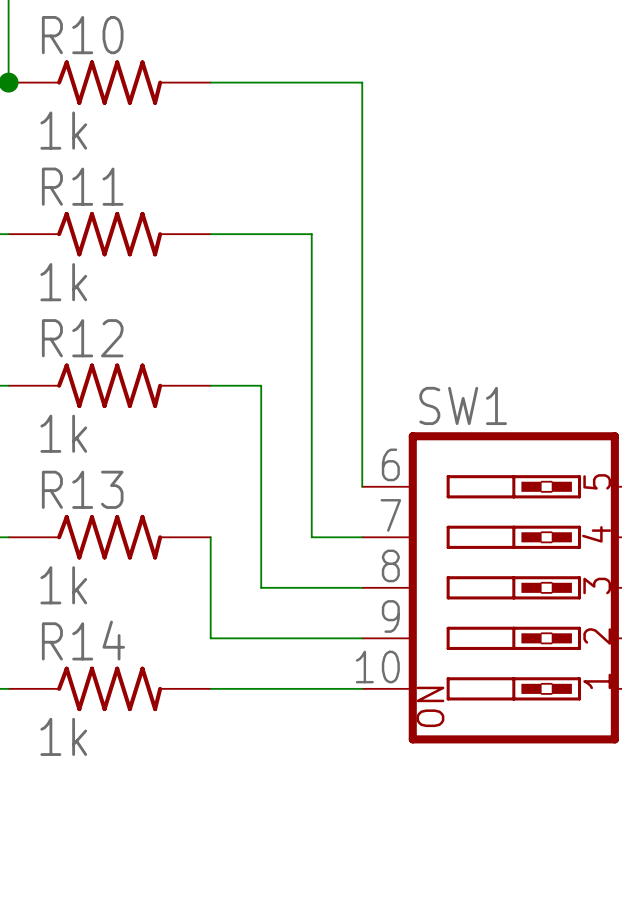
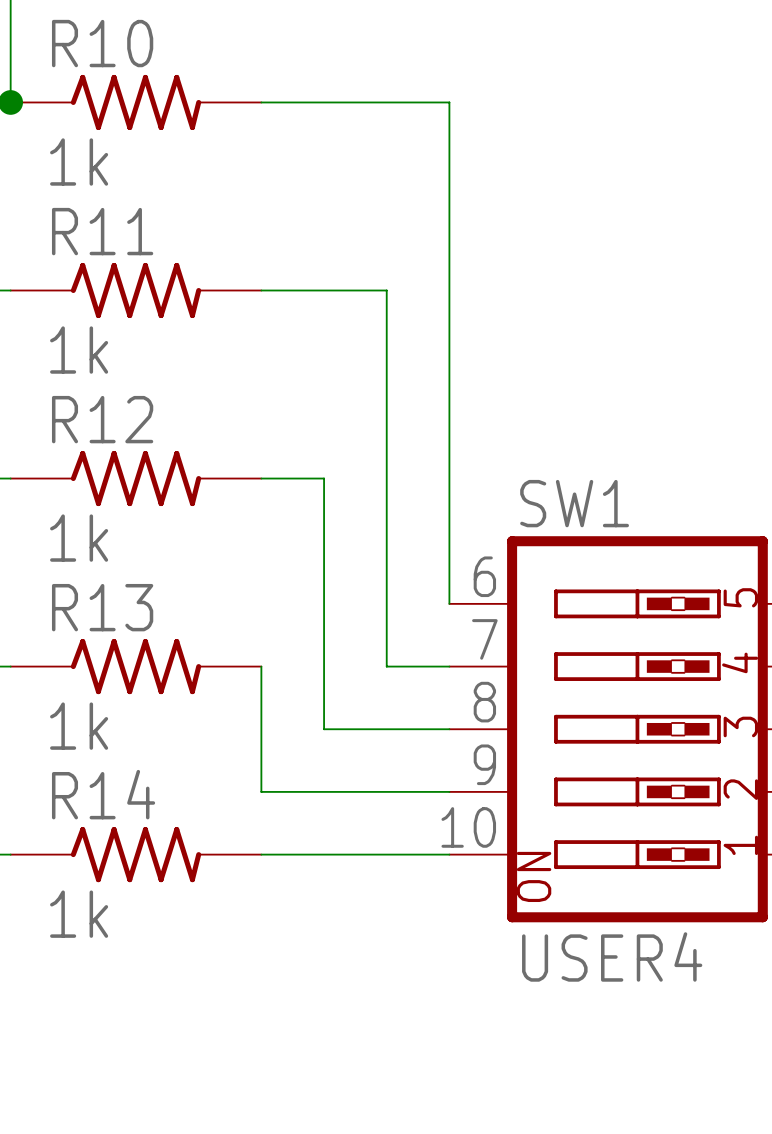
SW1 value: none -> USER4 (612, 956)

